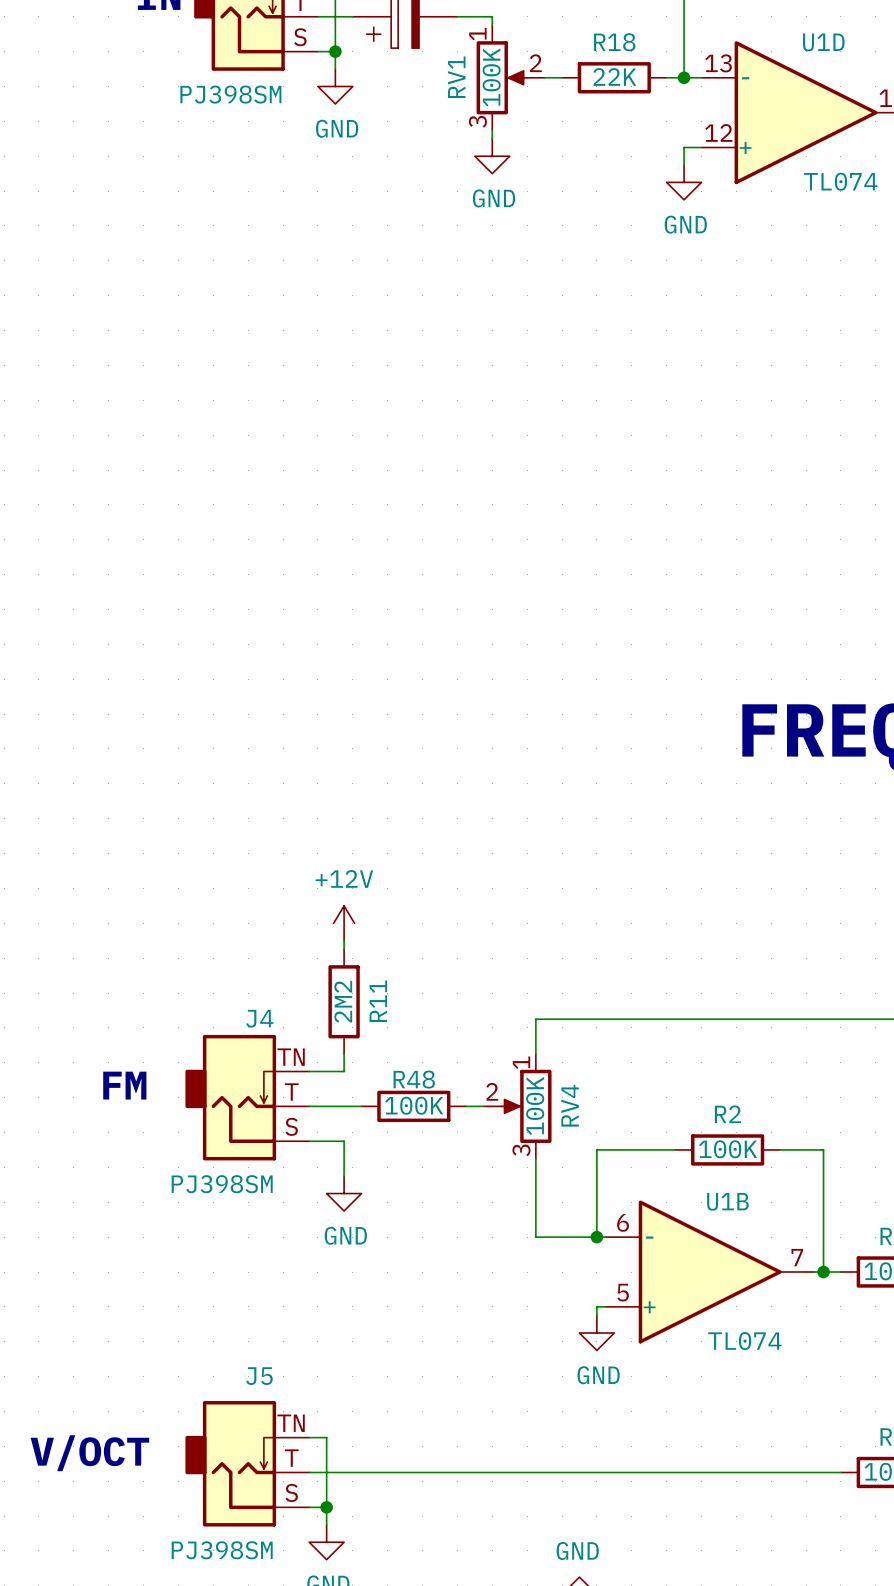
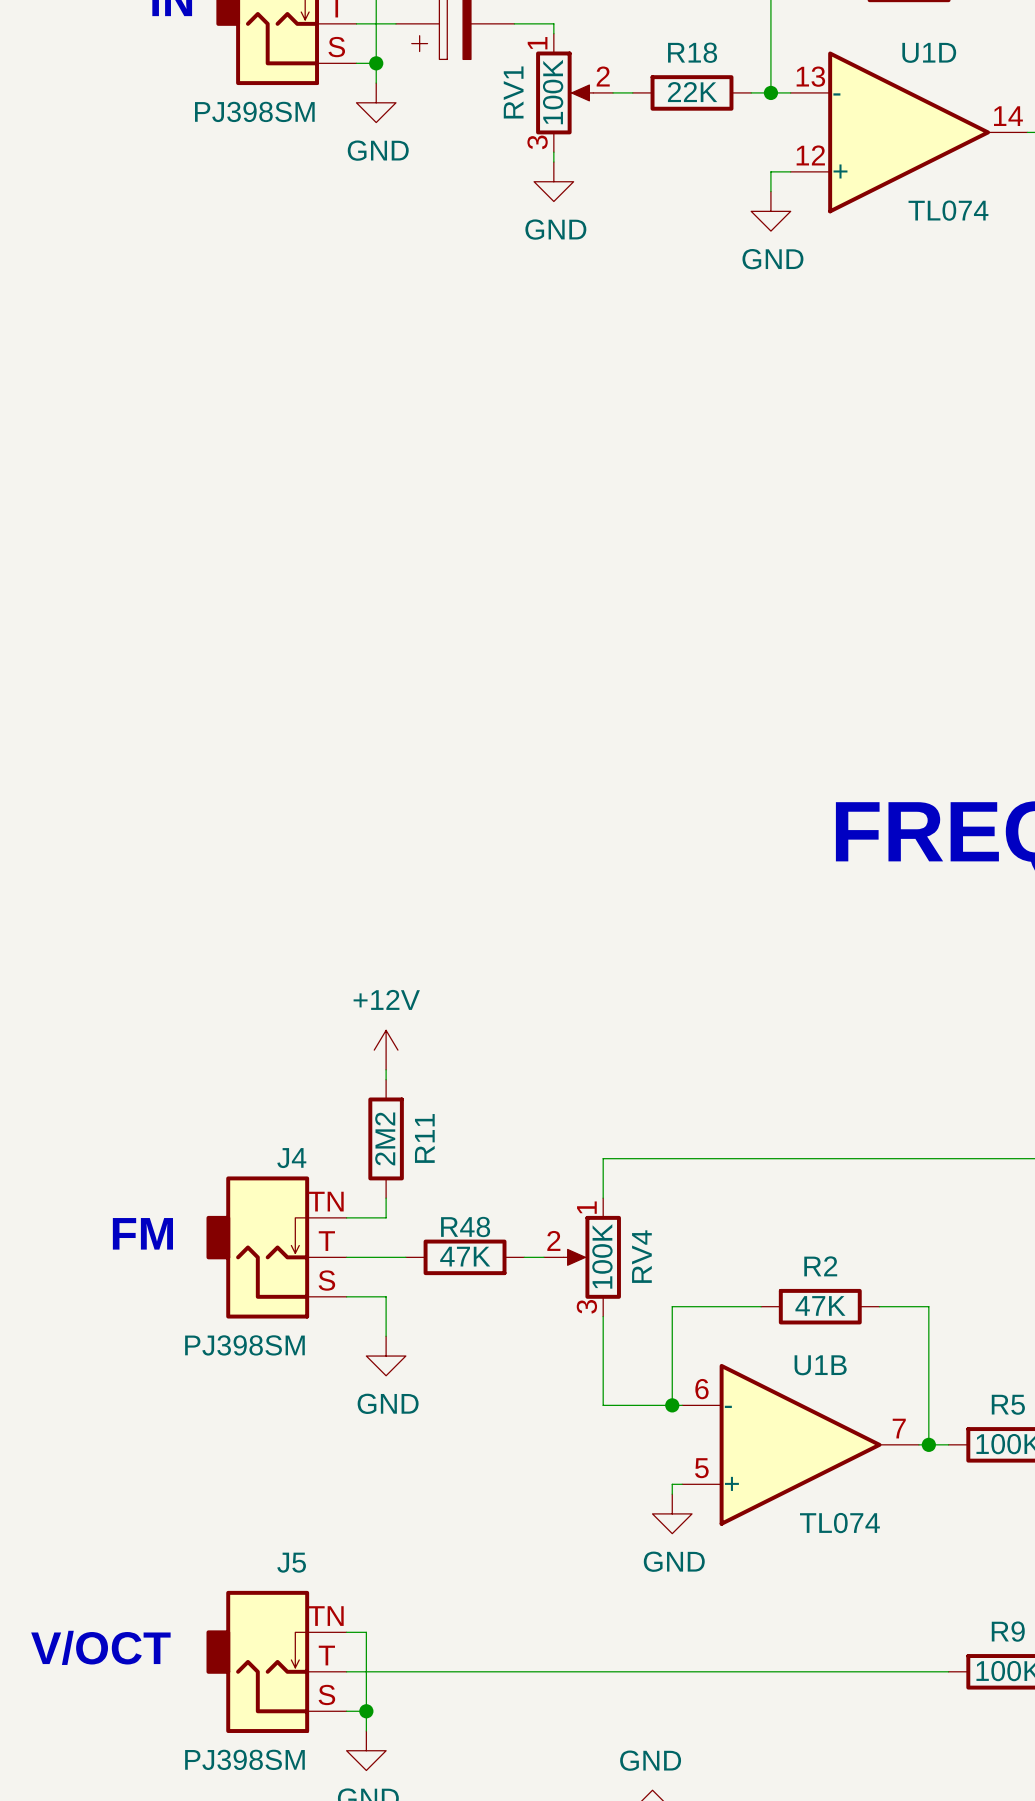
R48 value: 100K (414, 1105) -> 47K (465, 1256)
R2 value: 100K (728, 1149) -> 47K (820, 1305)

